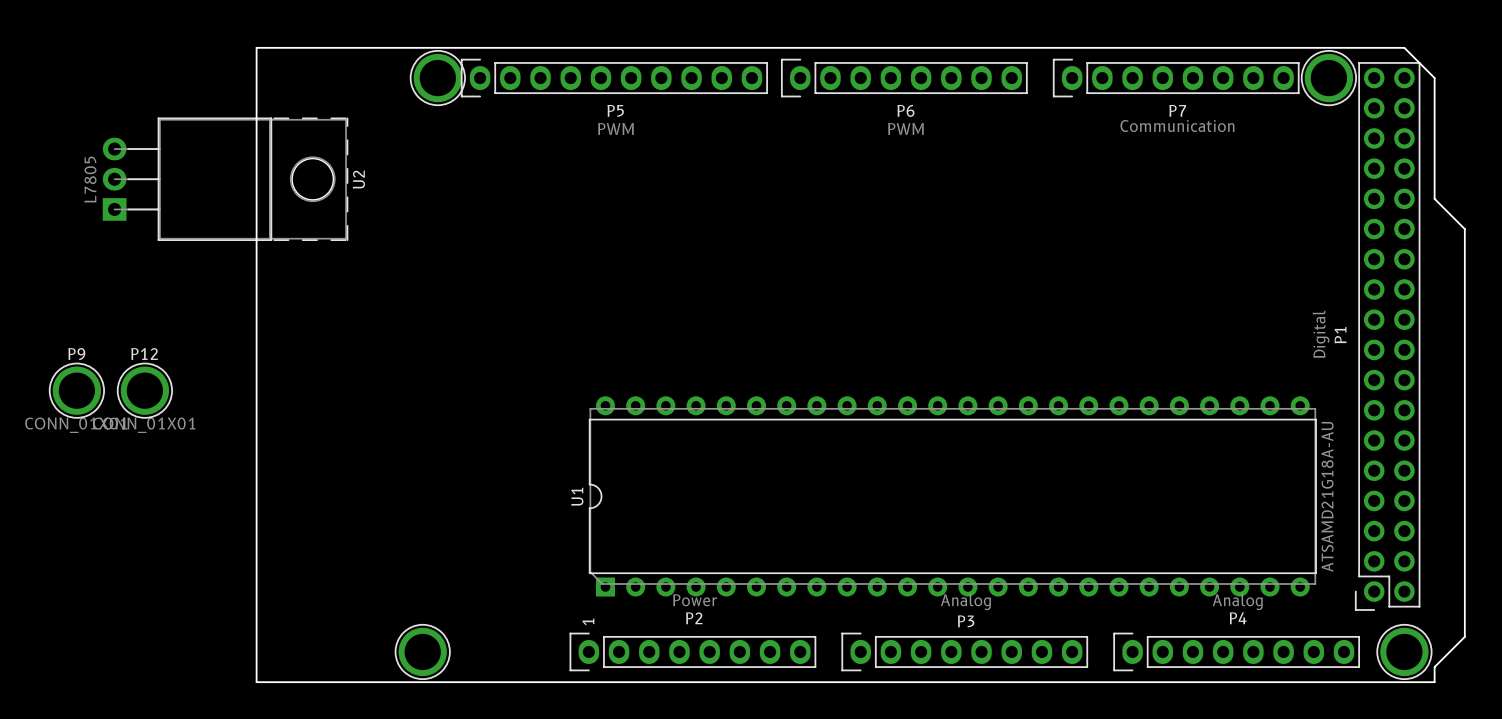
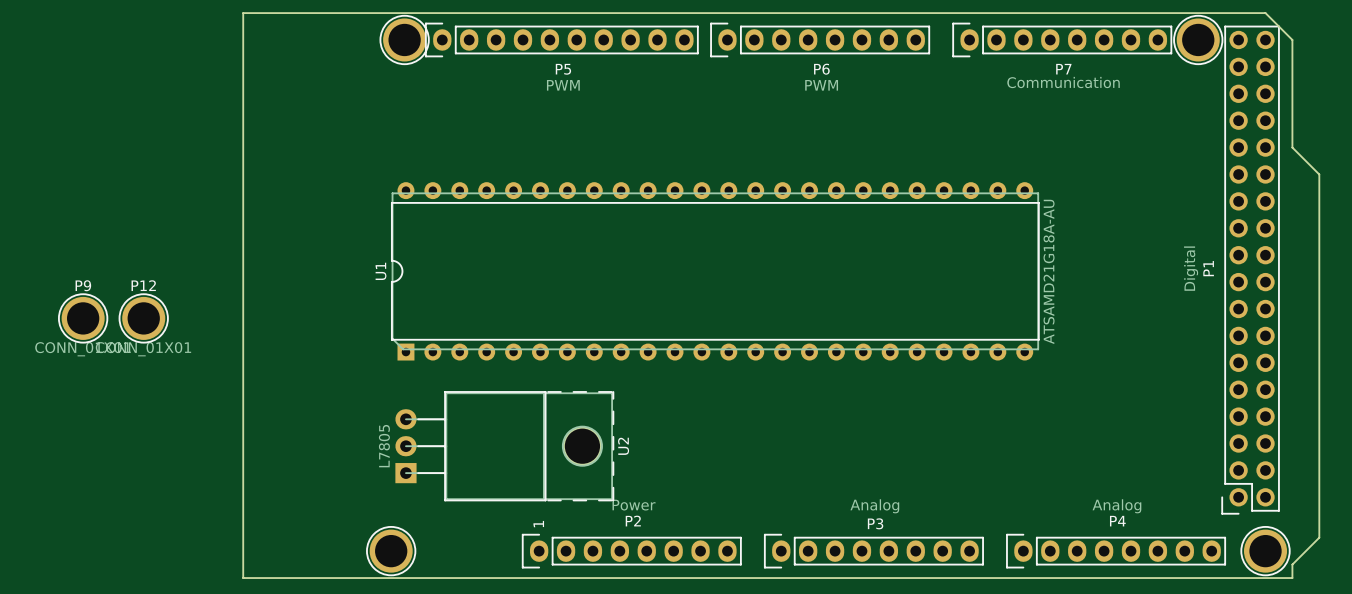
U2 position: (225, 179) -> (504, 446)
U1 position: (952, 496) -> (715, 271)

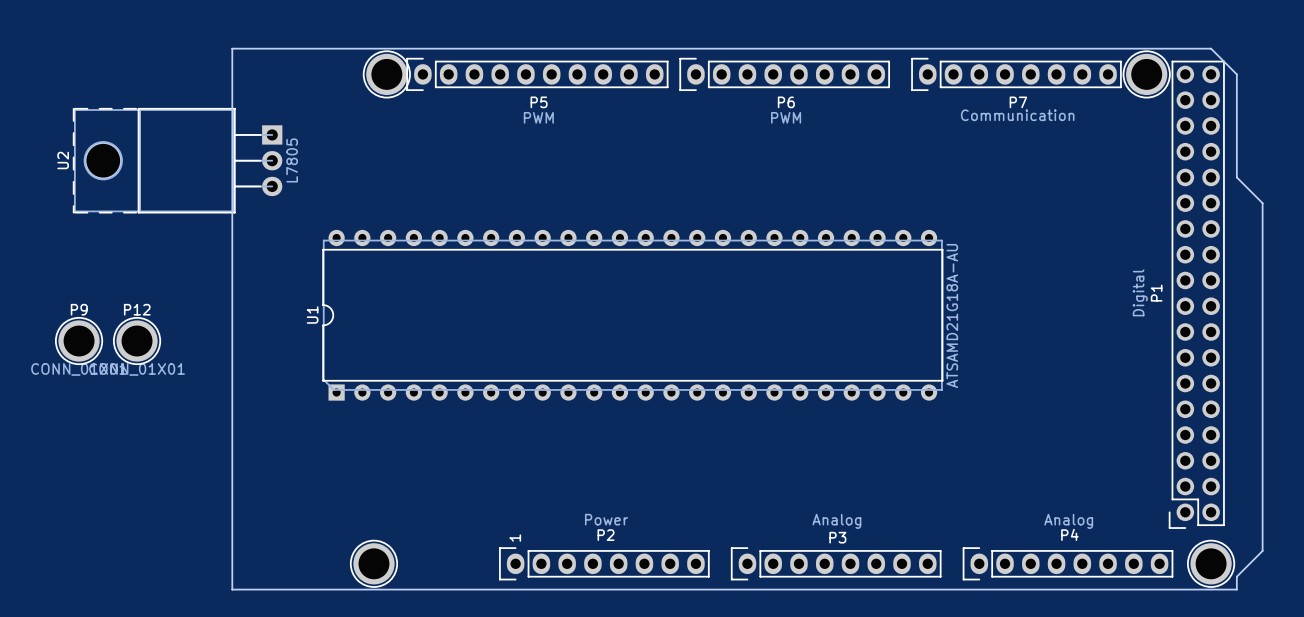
U1 position: (715, 271) -> (632, 315)
U2 rotation: 0° (504, 446) -> 180° (177, 160)
U2 position: (504, 446) -> (177, 160)

